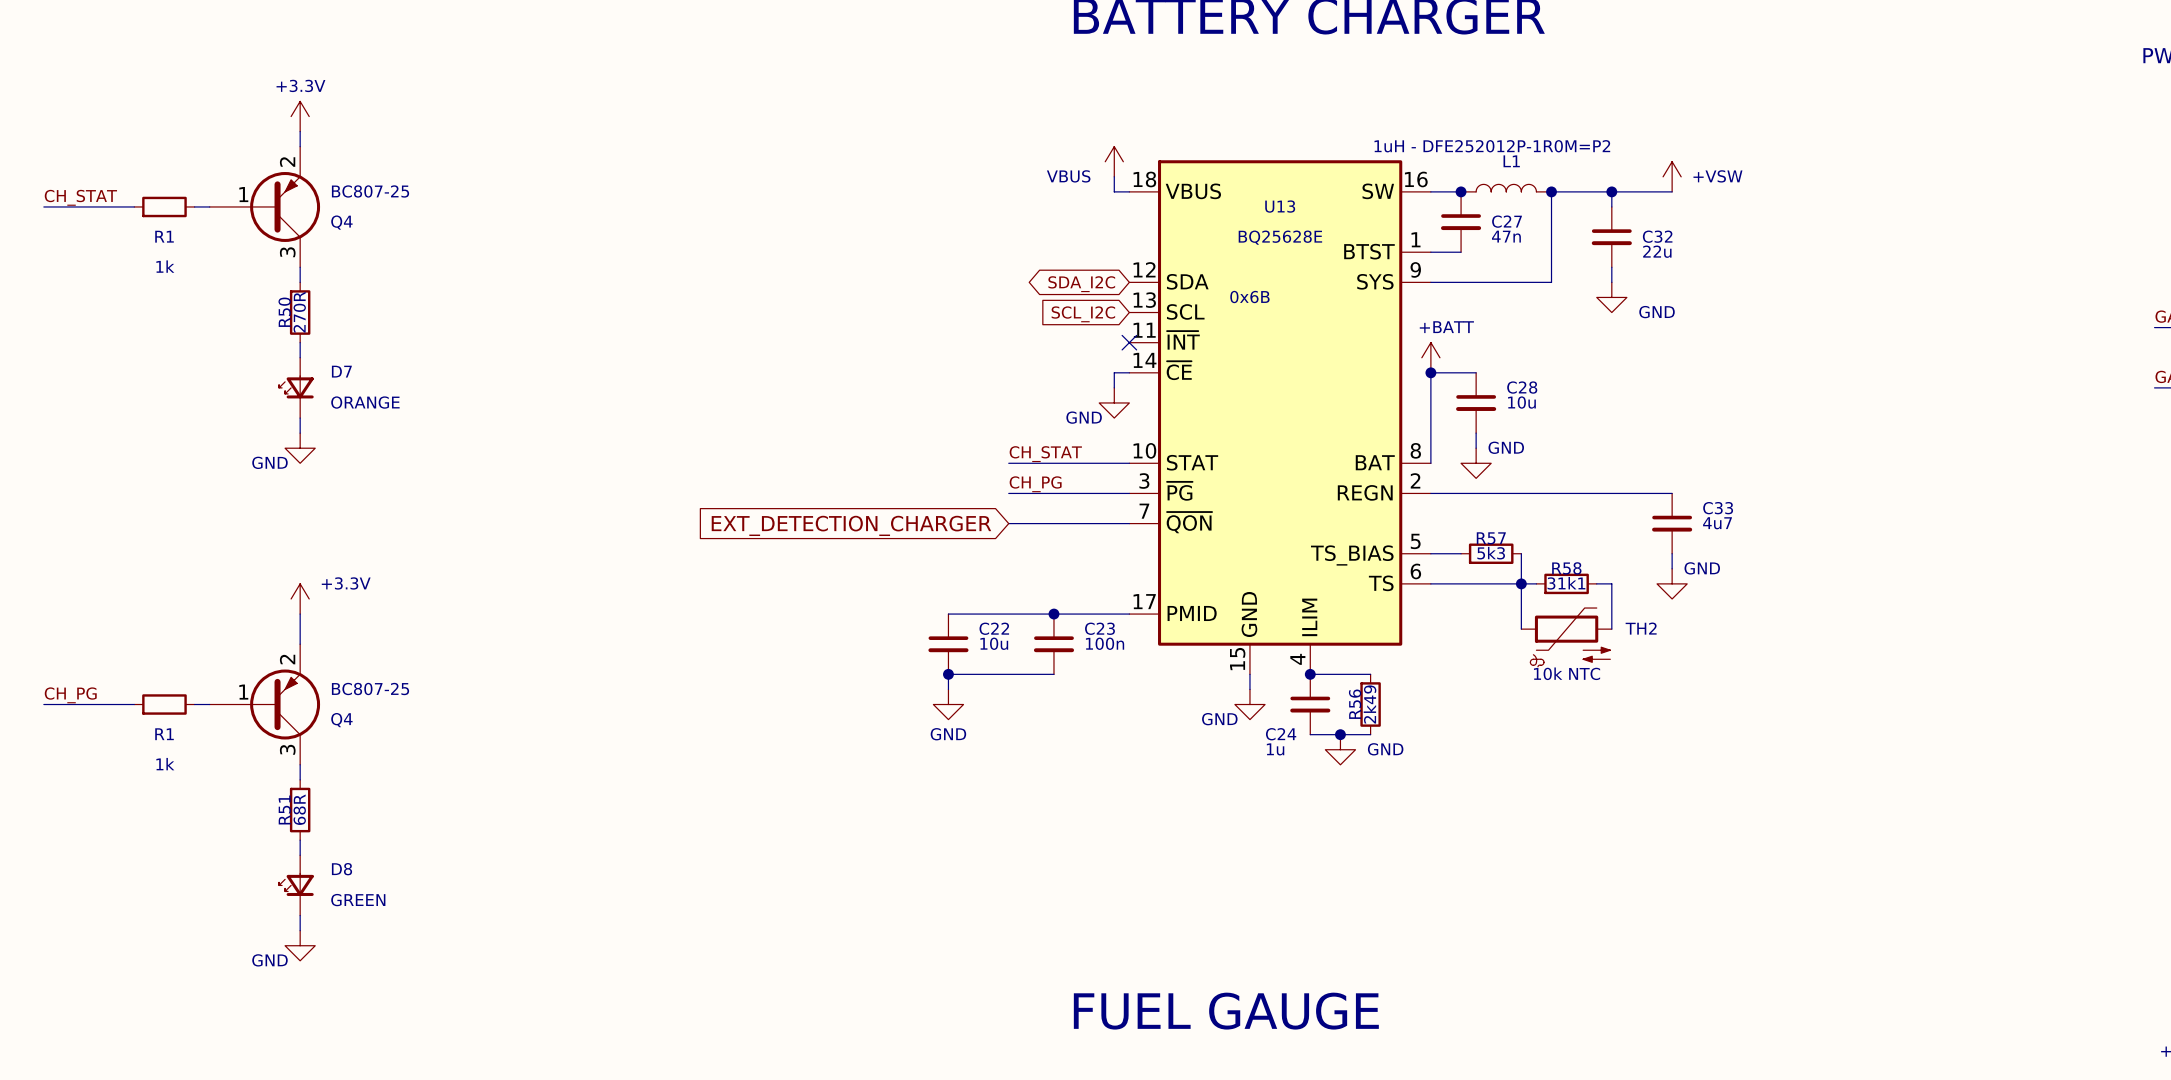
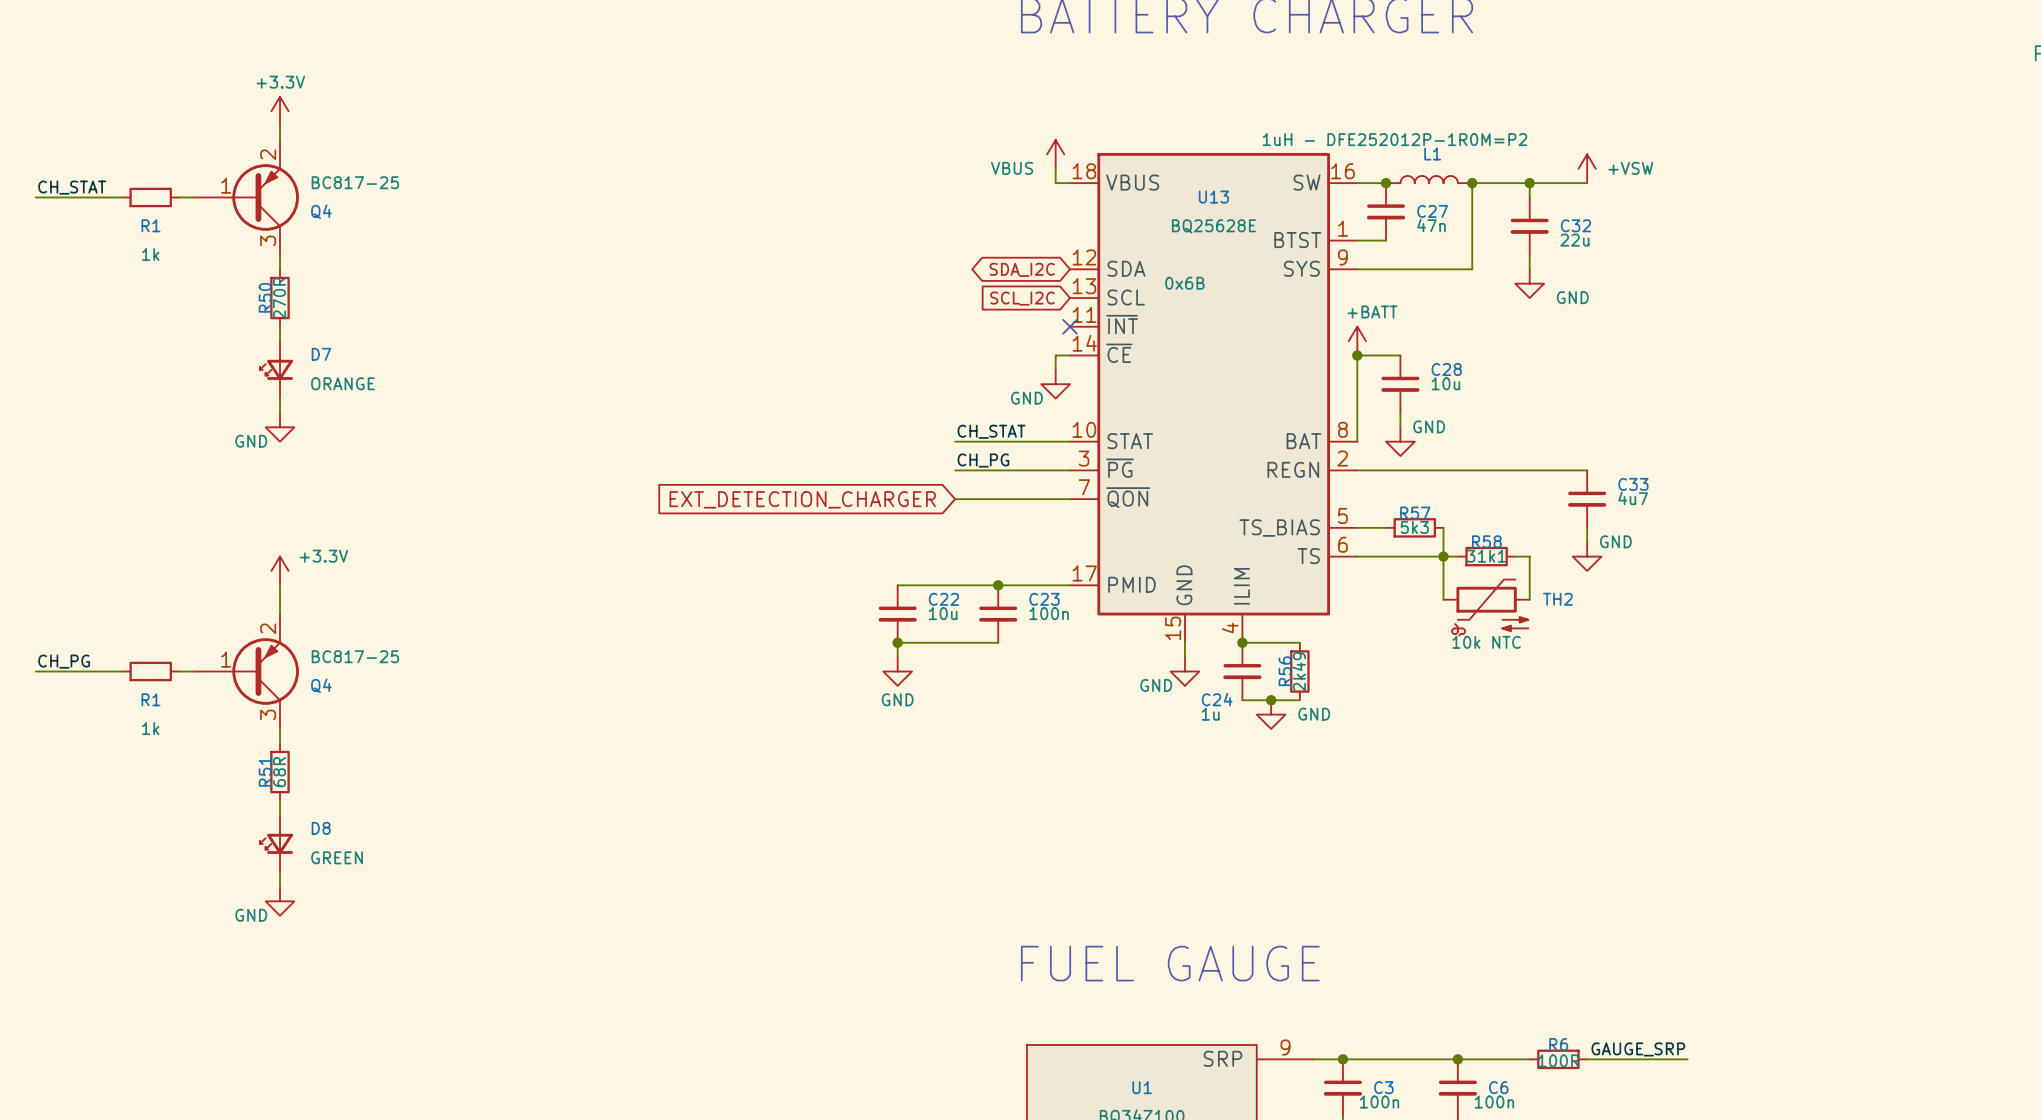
Q4 value: BC807-25 (370, 191) -> BC817-25 (355, 182)
Q4 value: BC807-25 (370, 689) -> BC817-25 (355, 656)

